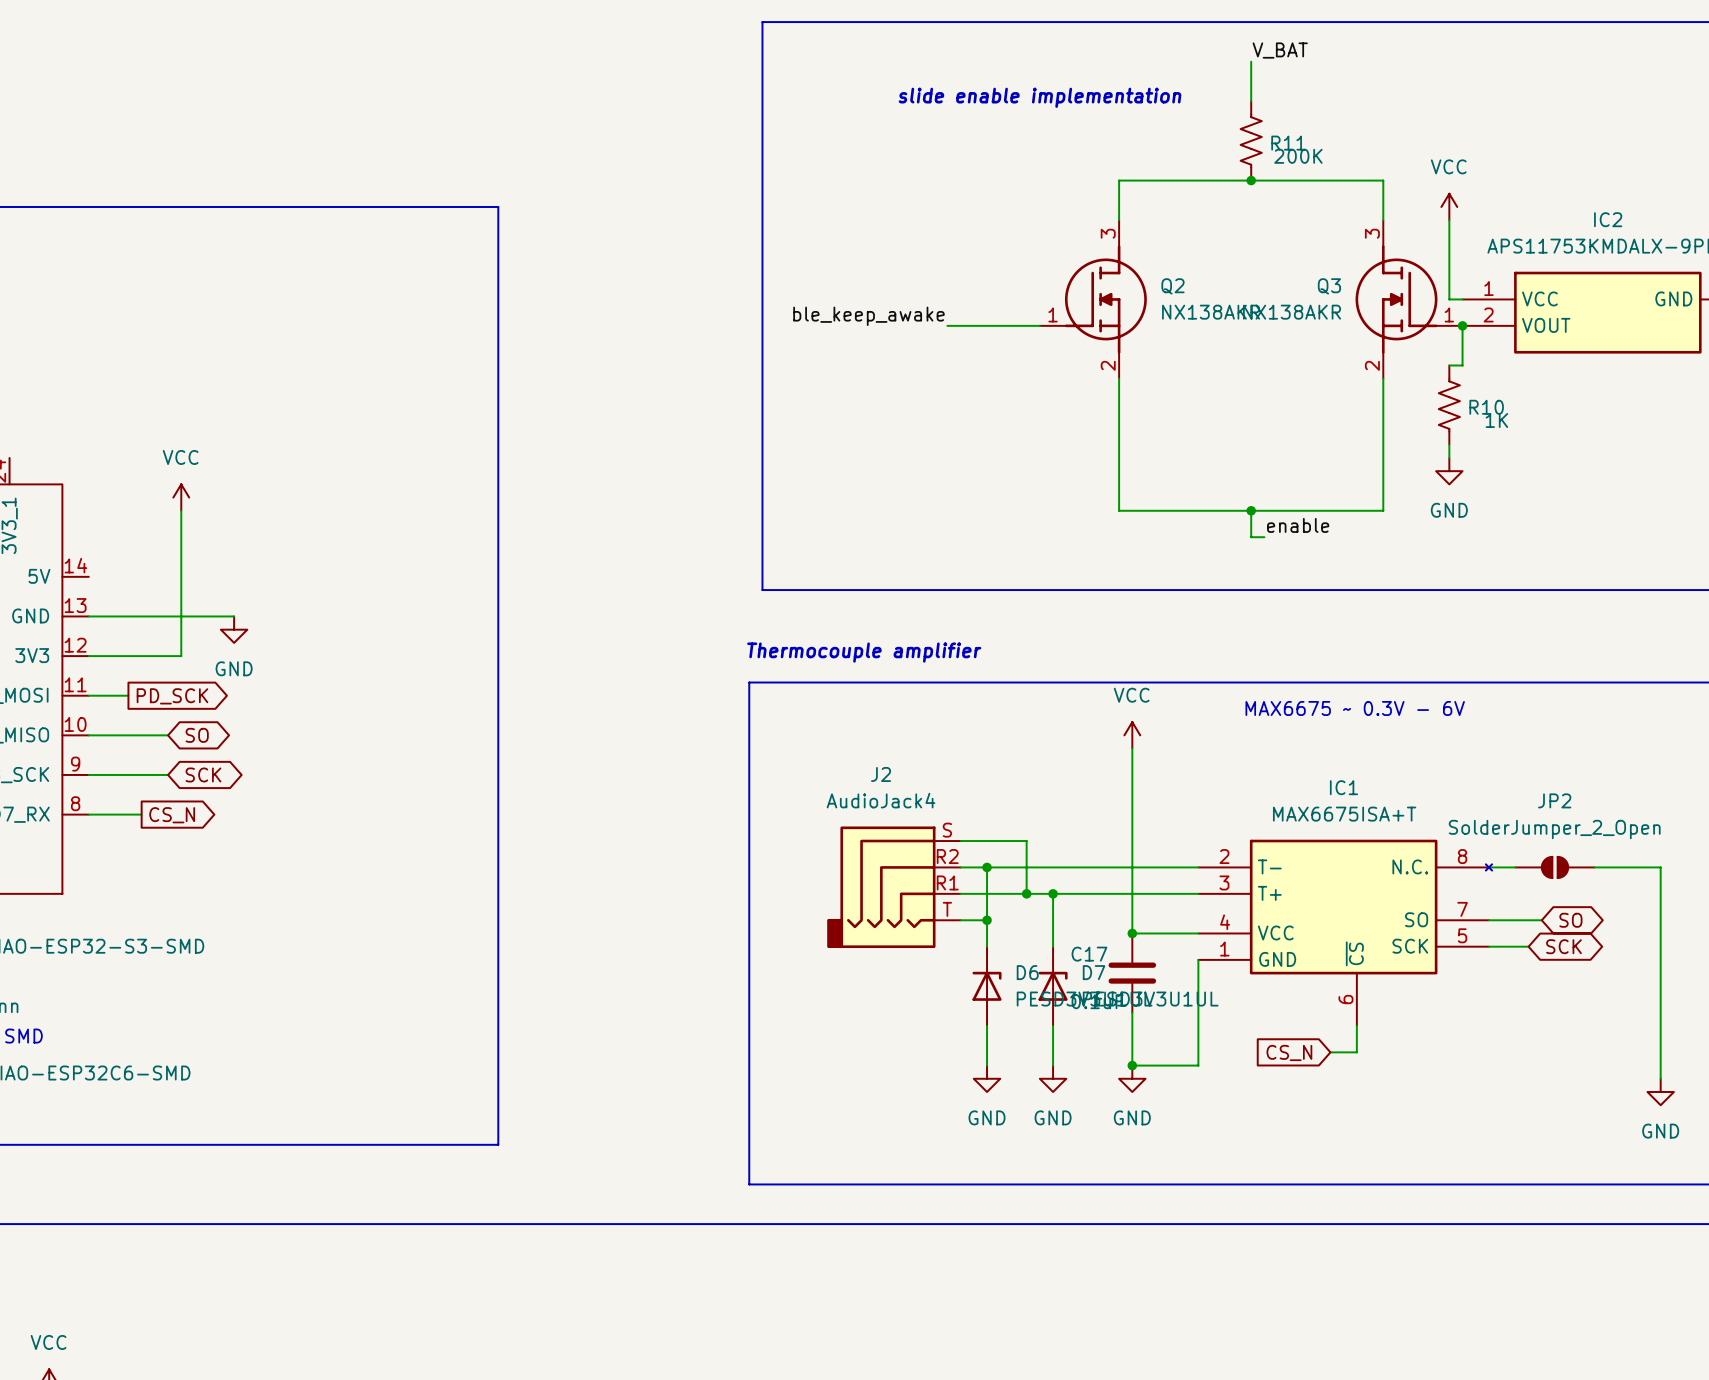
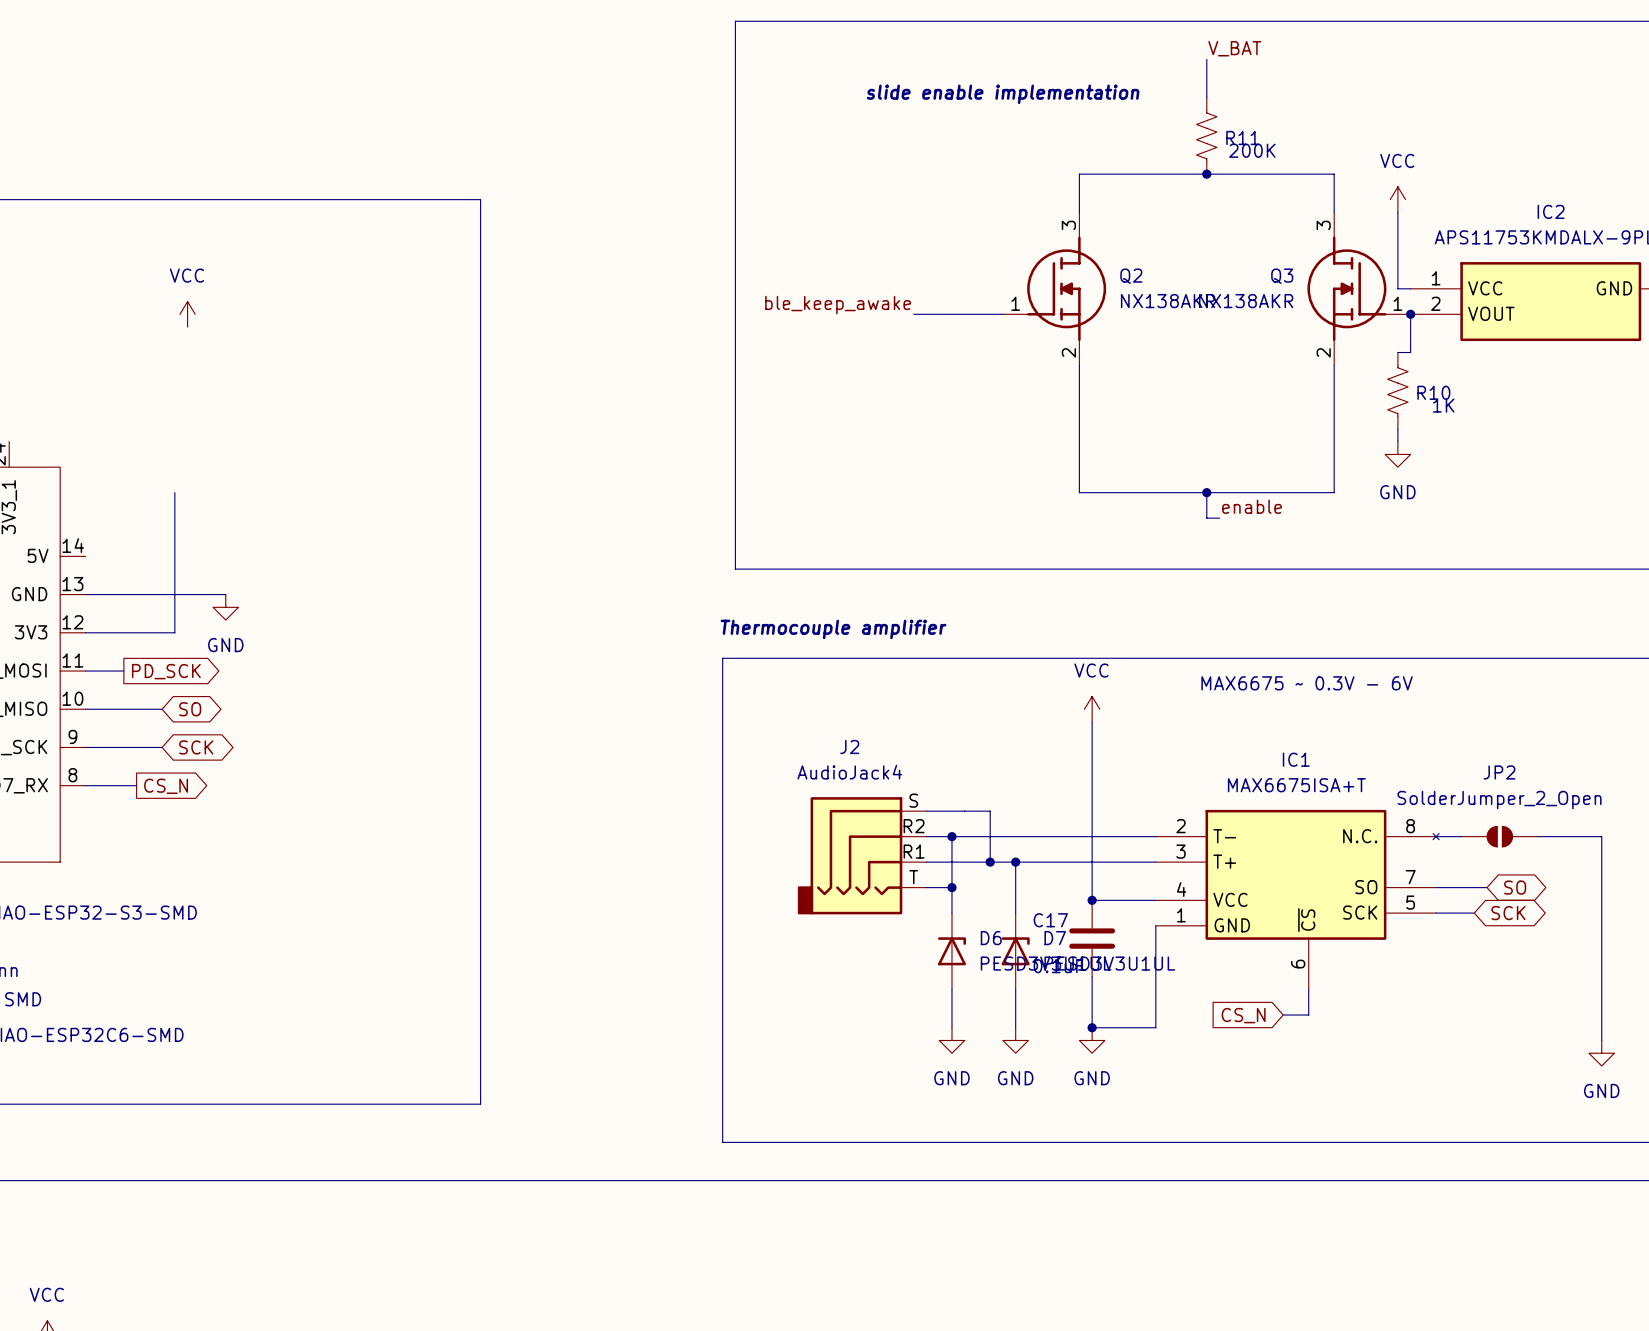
power symbol position: VCC (181, 497) -> VCC (187, 314)

